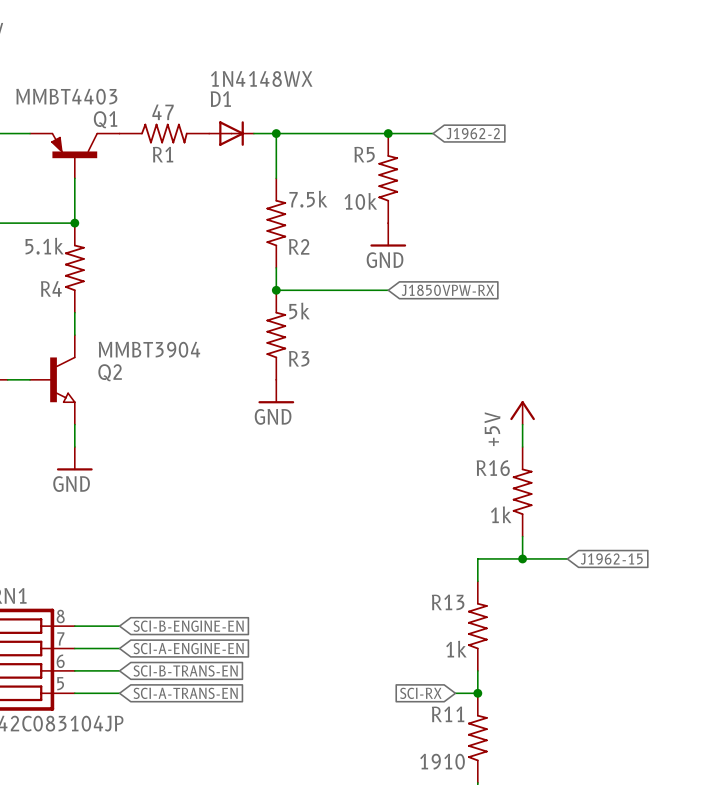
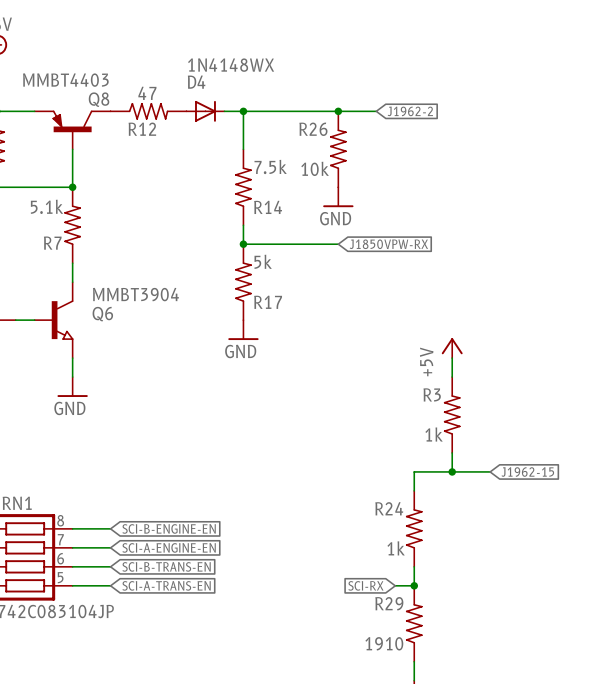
D1 name: D1 (220, 99) -> D4 (196, 82)
Q1 name: Q1 (105, 119) -> Q8 (99, 99)
R1 name: R1 (163, 154) -> R12 (142, 129)
R5 name: R5 (364, 154) -> R26 (313, 129)
R2 name: R2 (299, 246) -> R14 (268, 207)
R4 name: R4 (51, 288) -> R7 (52, 243)
R3 name: R3 (299, 358) -> R17 (268, 302)
Q2 name: Q2 (110, 372) -> Q6 (102, 314)
R16 name: R16 (493, 468) -> R3 (432, 394)
R13 name: R13 (448, 602) -> R24 (389, 508)
R11 name: R11 (448, 714) -> R29 (389, 603)

